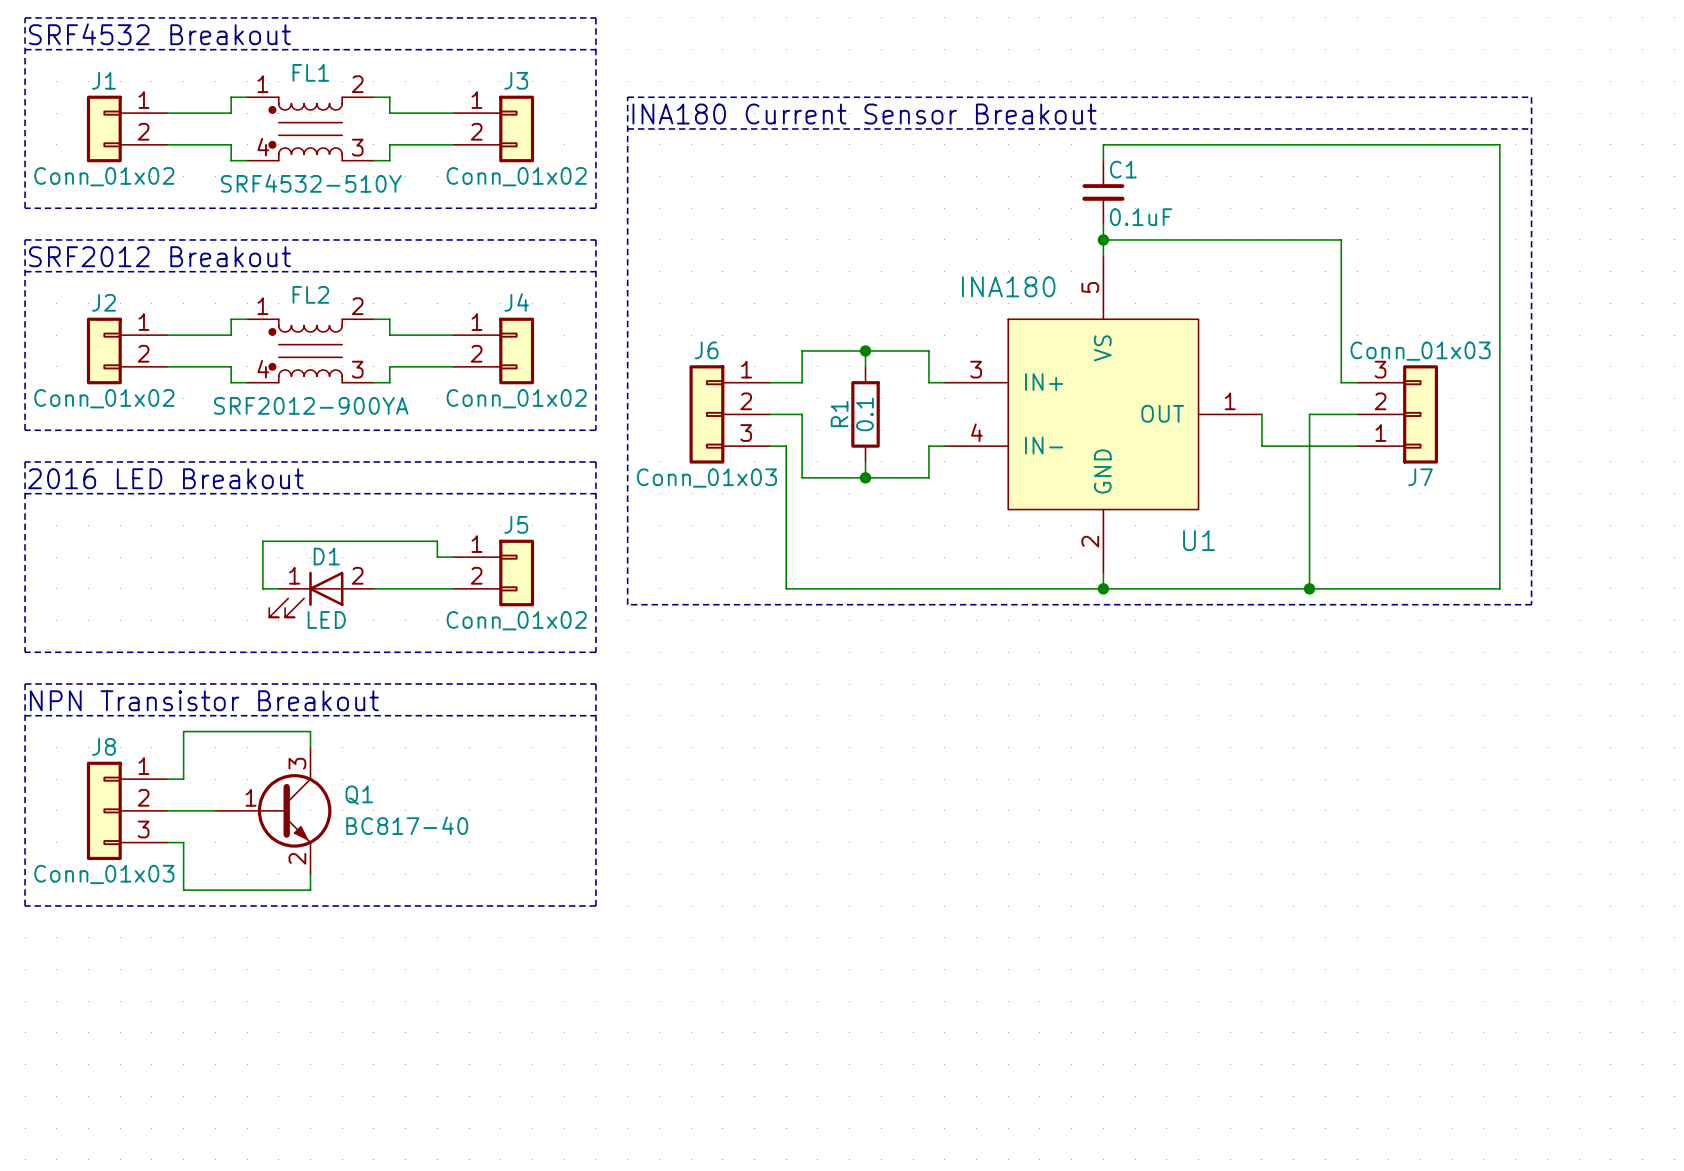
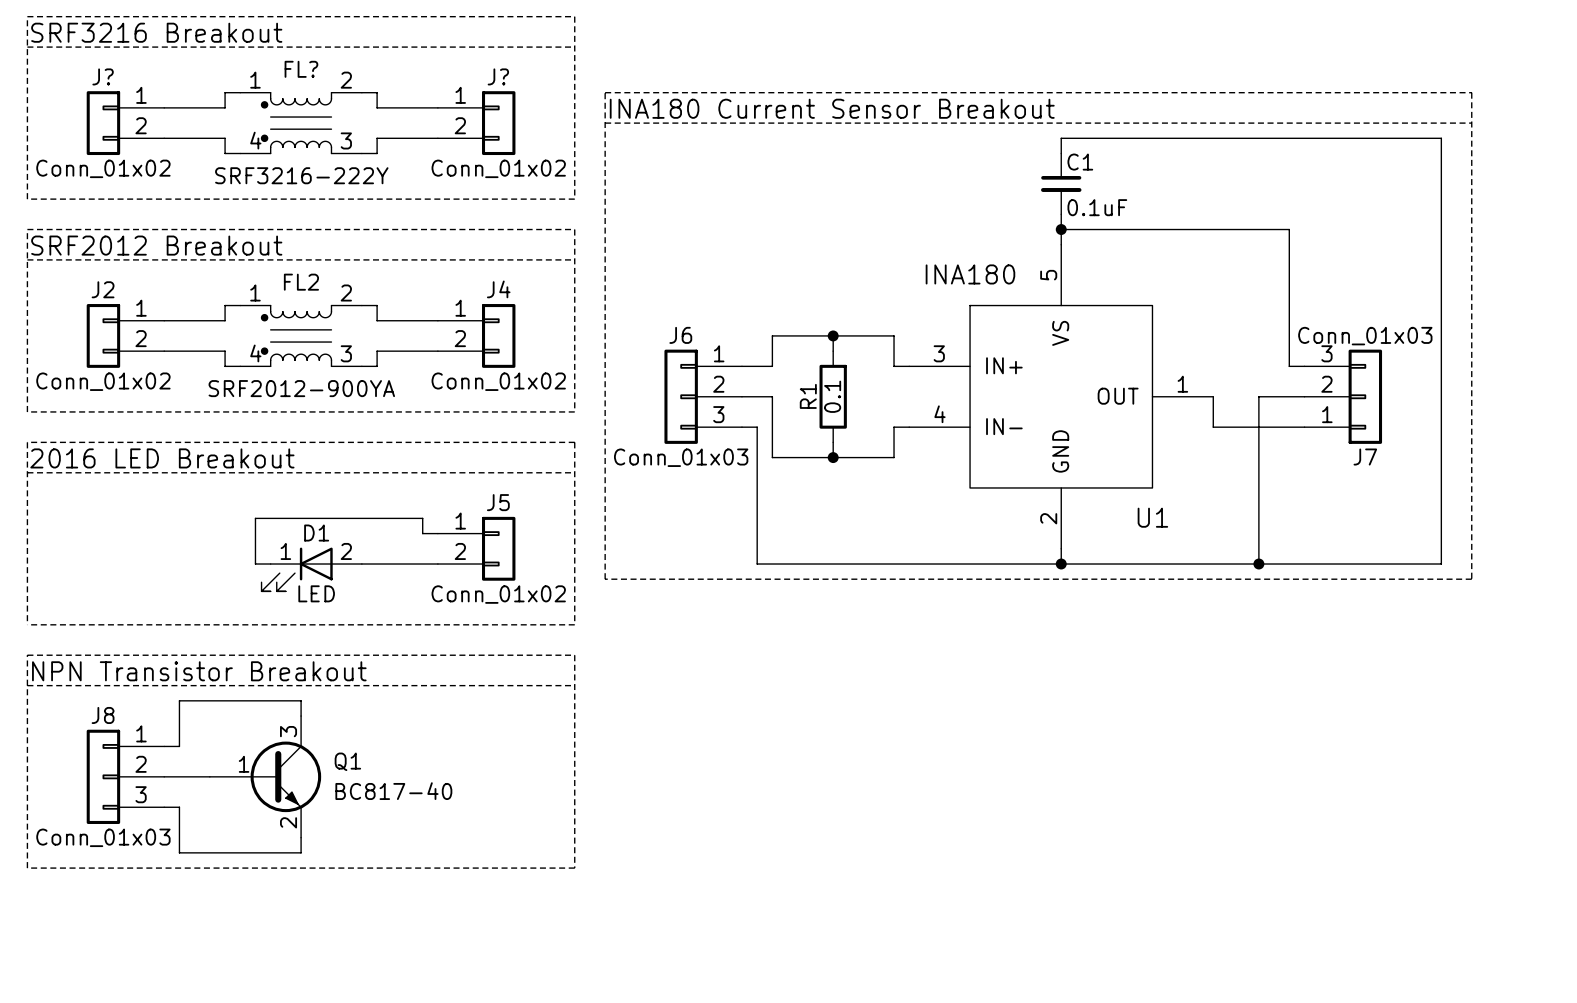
text: SRF4532 Breakout (159, 34) -> SRF3216 Breakout (156, 32)
FL1 name: FL1 (310, 72) -> FL? (301, 69)
J1 name: J1 (103, 80) -> J? (103, 76)
J3 name: J3 (516, 80) -> J? (498, 76)
FL1 value: SRF4532-510Y (311, 183) -> SRF3216-222Y (301, 175)

